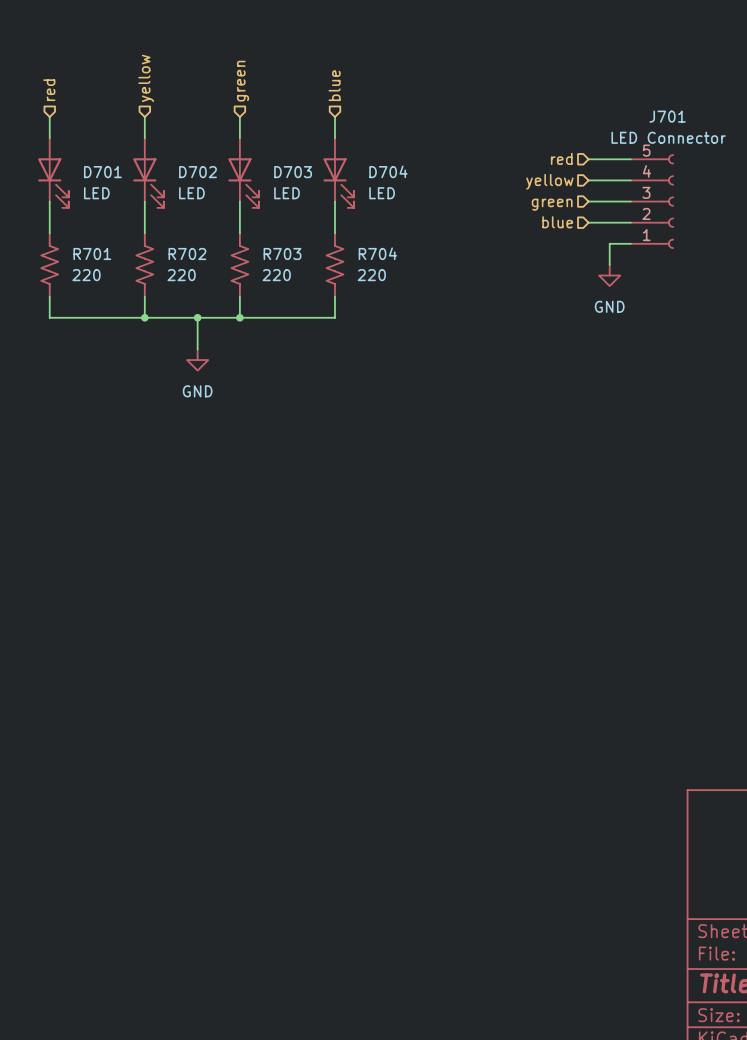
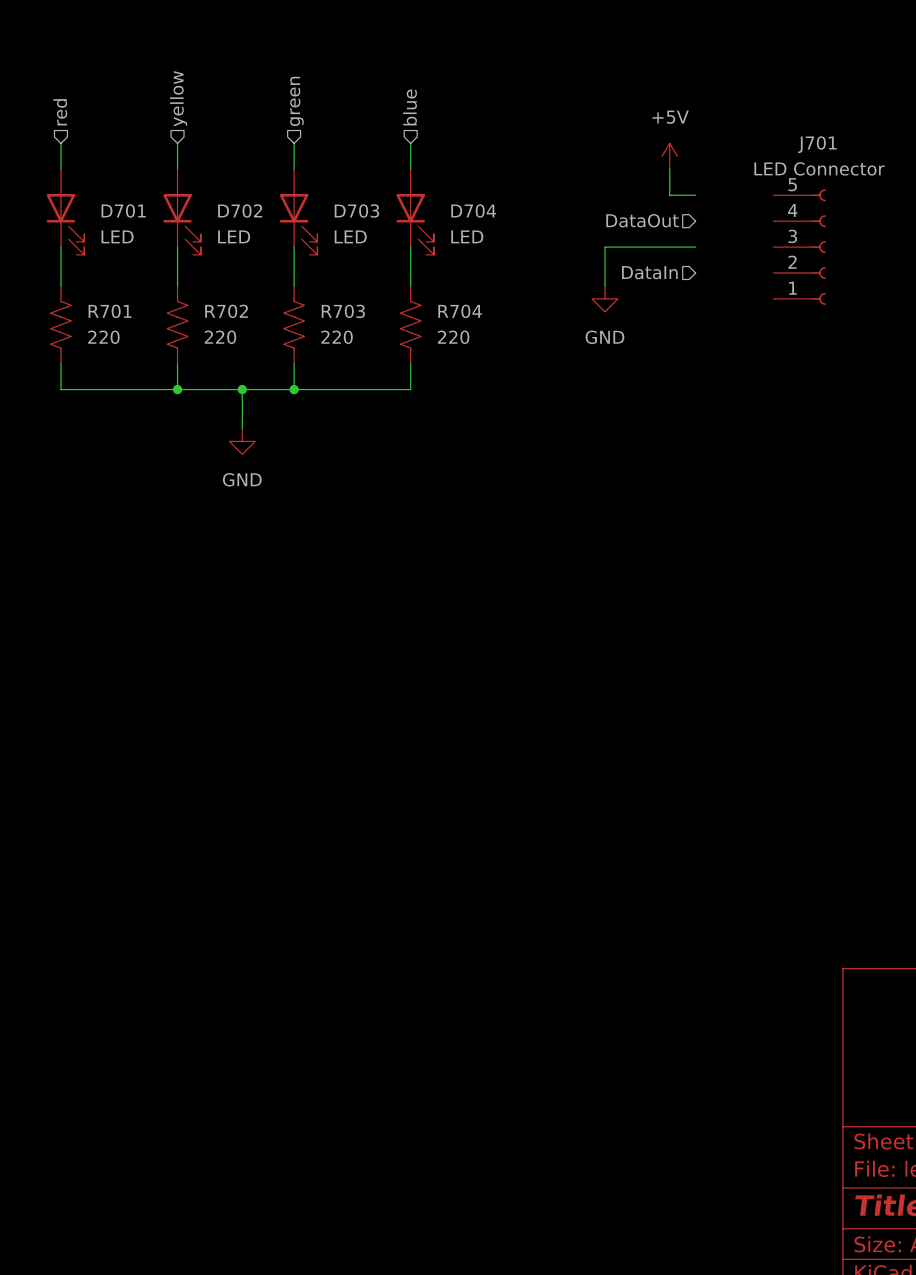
power symbol: none -> +5V (669, 156)
wire: none -> (669, 169) (669, 195) (695, 195)
hierarchical label: red (561, 158) -> none
wire: (588, 159) (630, 159) -> none
hierarchical label: none -> DataOut (642, 220)
wire: (588, 180) (630, 180) -> none
hierarchical label: yellow (549, 181) -> none
wire: none -> (695, 247) (604, 247) (604, 285)
wire: (588, 201) (630, 201) -> none
hierarchical label: green (552, 204) -> none
hierarchical label: none -> DataIn (649, 272)
hierarchical label: blue (557, 222) -> none
wire: (588, 222) (630, 222) -> none
wire: (630, 243) (609, 243) (609, 264) -> none
power symbol position: GND (609, 275) -> GND (604, 298)

